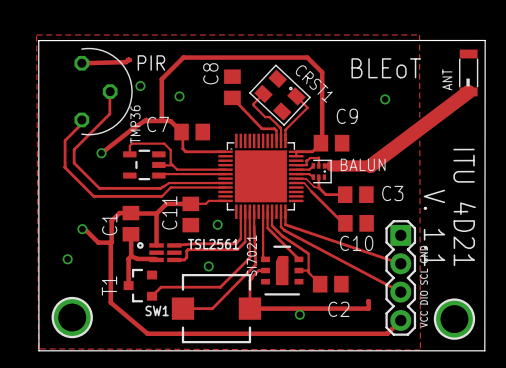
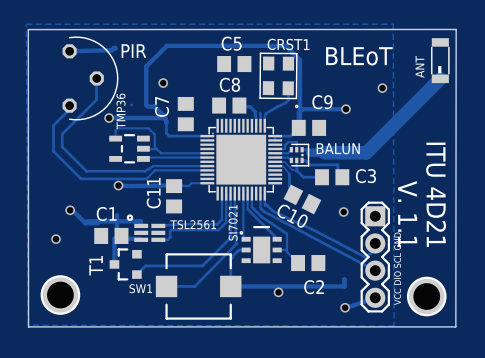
CRST1 footprint: [249, 64, 311, 126] -> [259, 52, 299, 109]
C5: none -> (234, 64)
CRST1 name position: CRST1 (314, 84) -> CRST1 (288, 44)
via: (140, 86) -> none
C8 rotation: 0° (232, 87) -> 90° clockwise (229, 105)
C8 position: (232, 87) -> (229, 105)
track: (468, 91) (370, 165) (324, 165) -> (440, 78) (366, 152) (310, 152) (307, 149) (302, 149)
track: (263, 93) (253, 105) (279, 127) -> none
track: (296, 96) (307, 107) (285, 130) -> (288, 88) (288, 100) (264, 116)
track: (232, 97) (262, 128) (274, 128) (276, 131) -> (239, 105) (250, 106) (255, 111) (256, 117)
via: (385, 99) -> none
via: none -> (382, 88)
track: (146, 119) (101, 153) -> none
track: (162, 120) (144, 120) -> none
track: none -> (345, 109) (302, 109) (298, 112) (298, 127)
via: none -> (345, 109)
track: none -> (109, 118) (164, 118) (166, 123)
via: none -> (109, 118)
C7 rotation: 0° (192, 132) -> 90° clockwise (185, 114)
via: (101, 153) -> none
track: none -> (302, 160) (305, 160) (310, 165) (337, 164) (338, 177)
track: (311, 191) (345, 223) -> (289, 174) (289, 190) (293, 194)
via: none -> (118, 185)
track: (190, 203) (166, 203) (156, 213) -> (174, 186) (181, 185) (118, 185)
track: (156, 213) (156, 245) -> (87, 221) (140, 221) (141, 225)
track: (156, 213) (119, 213) (111, 220) (110, 302) (147, 333) (387, 333) (400, 320) -> (345, 307) (375, 297)
C1 rotation: 0° (130, 223) -> 90° clockwise (111, 235)
C1 position: (130, 223) -> (111, 235)
C10 rotation: 0° (356, 223) -> 27° clockwise (302, 199)
C10 position: (356, 223) -> (302, 199)
via: (217, 224) -> none
track: (285, 224) (400, 263) -> (264, 203) (272, 210) (364, 257) (375, 250) (375, 243)
via: none -> (343, 212)
TSL2561 footprint: [136, 242, 182, 263] -> [126, 214, 166, 242]
SI7021 footprint: [261, 245, 304, 296] -> [239, 226, 282, 264]
via: (208, 266) -> none
via: none -> (345, 307)

